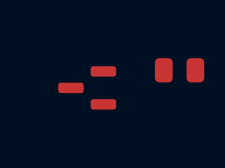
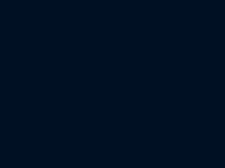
part: (179, 70) -> none
part: (87, 87) -> none

